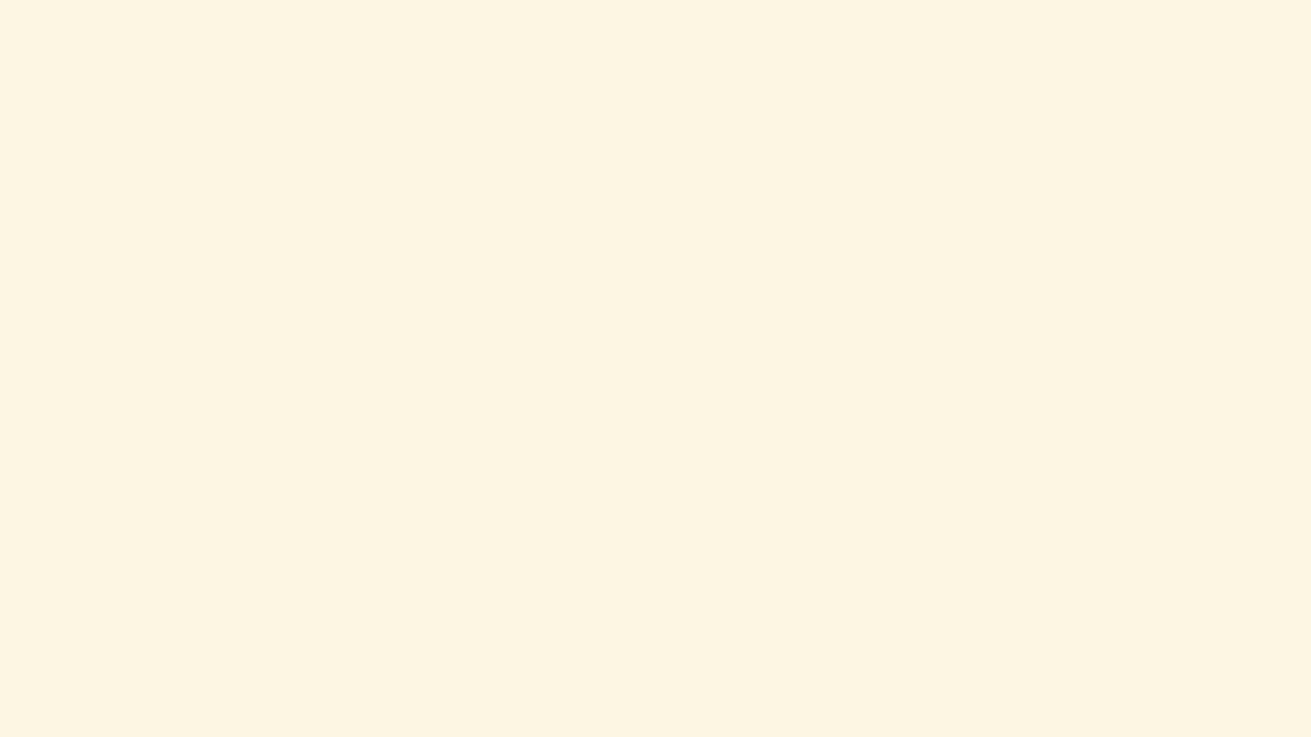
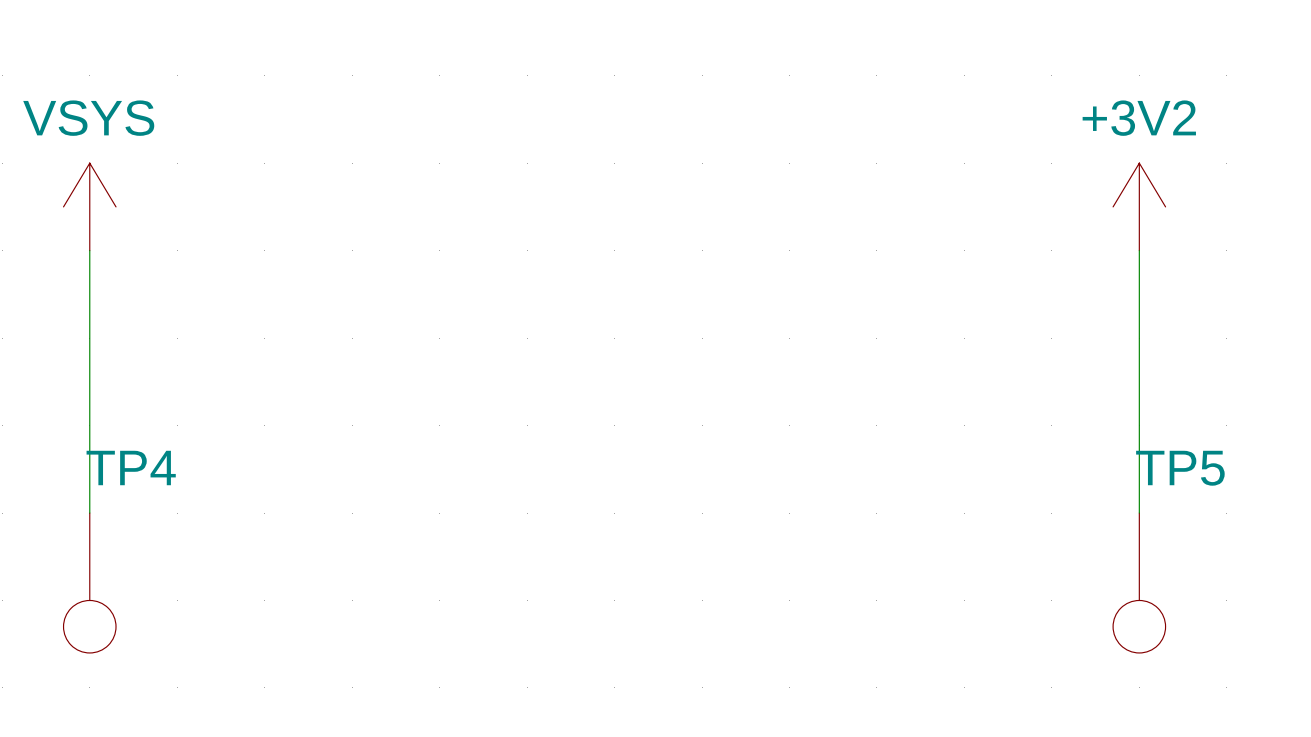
power symbol: none -> VSYS (89, 206)
power symbol: none -> +3V2 (1139, 206)
wire: none -> (89, 250) (89, 513)
wire: none -> (1139, 250) (1139, 513)
TP4: none -> (89, 582)
TP5: none -> (1139, 582)

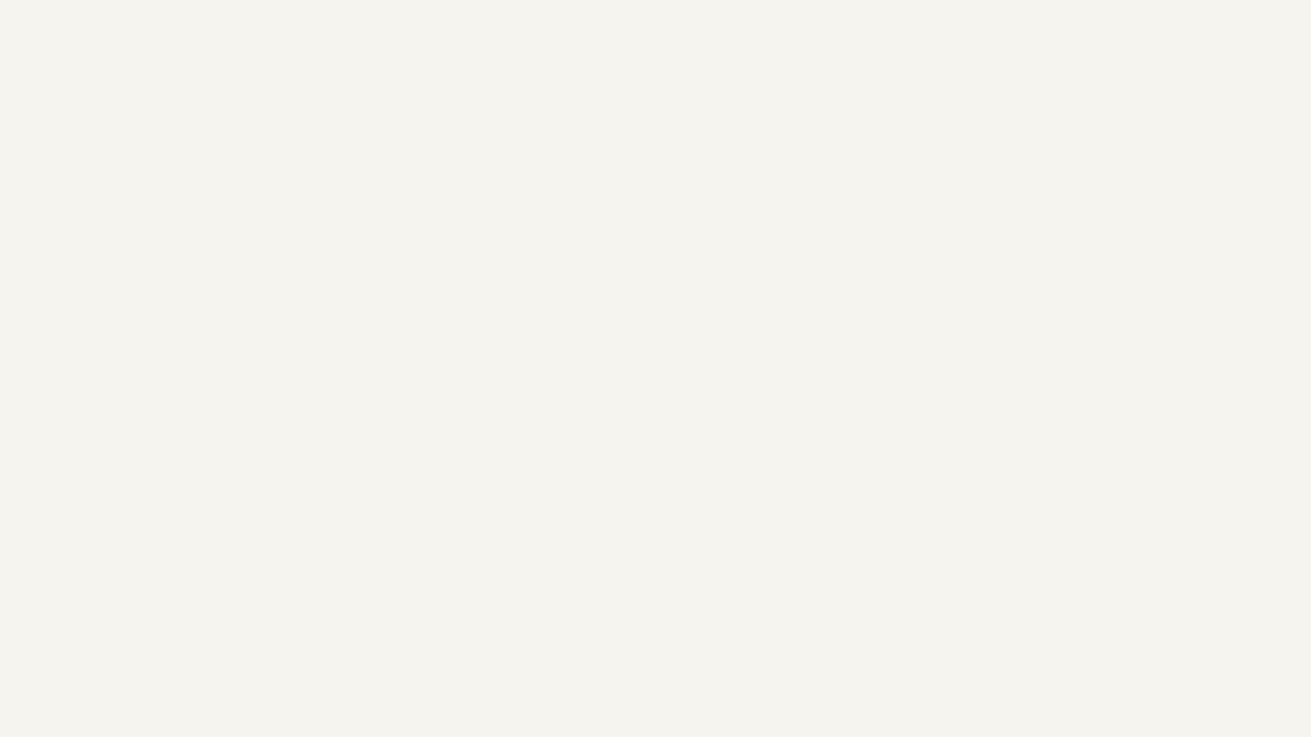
power symbol: VSYS (89, 206) -> none
power symbol: +3V2 (1139, 206) -> none
wire: (89, 250) (89, 513) -> none
wire: (1139, 250) (1139, 513) -> none
TP4: (89, 582) -> none
TP5: (1139, 582) -> none

